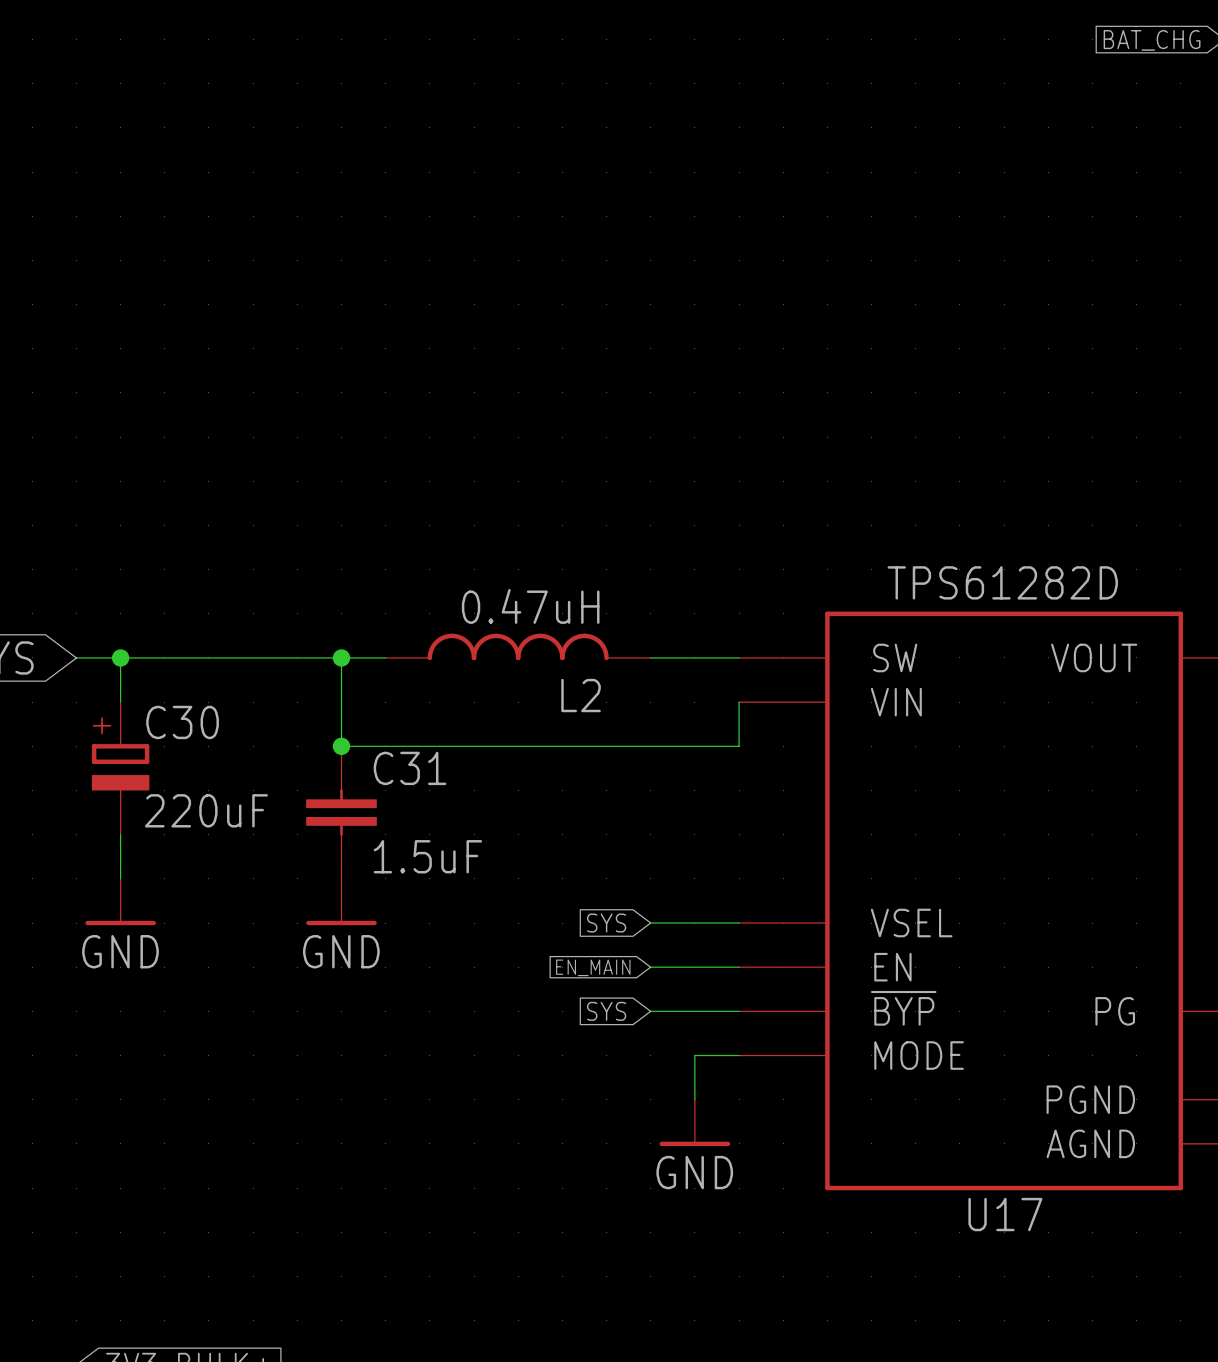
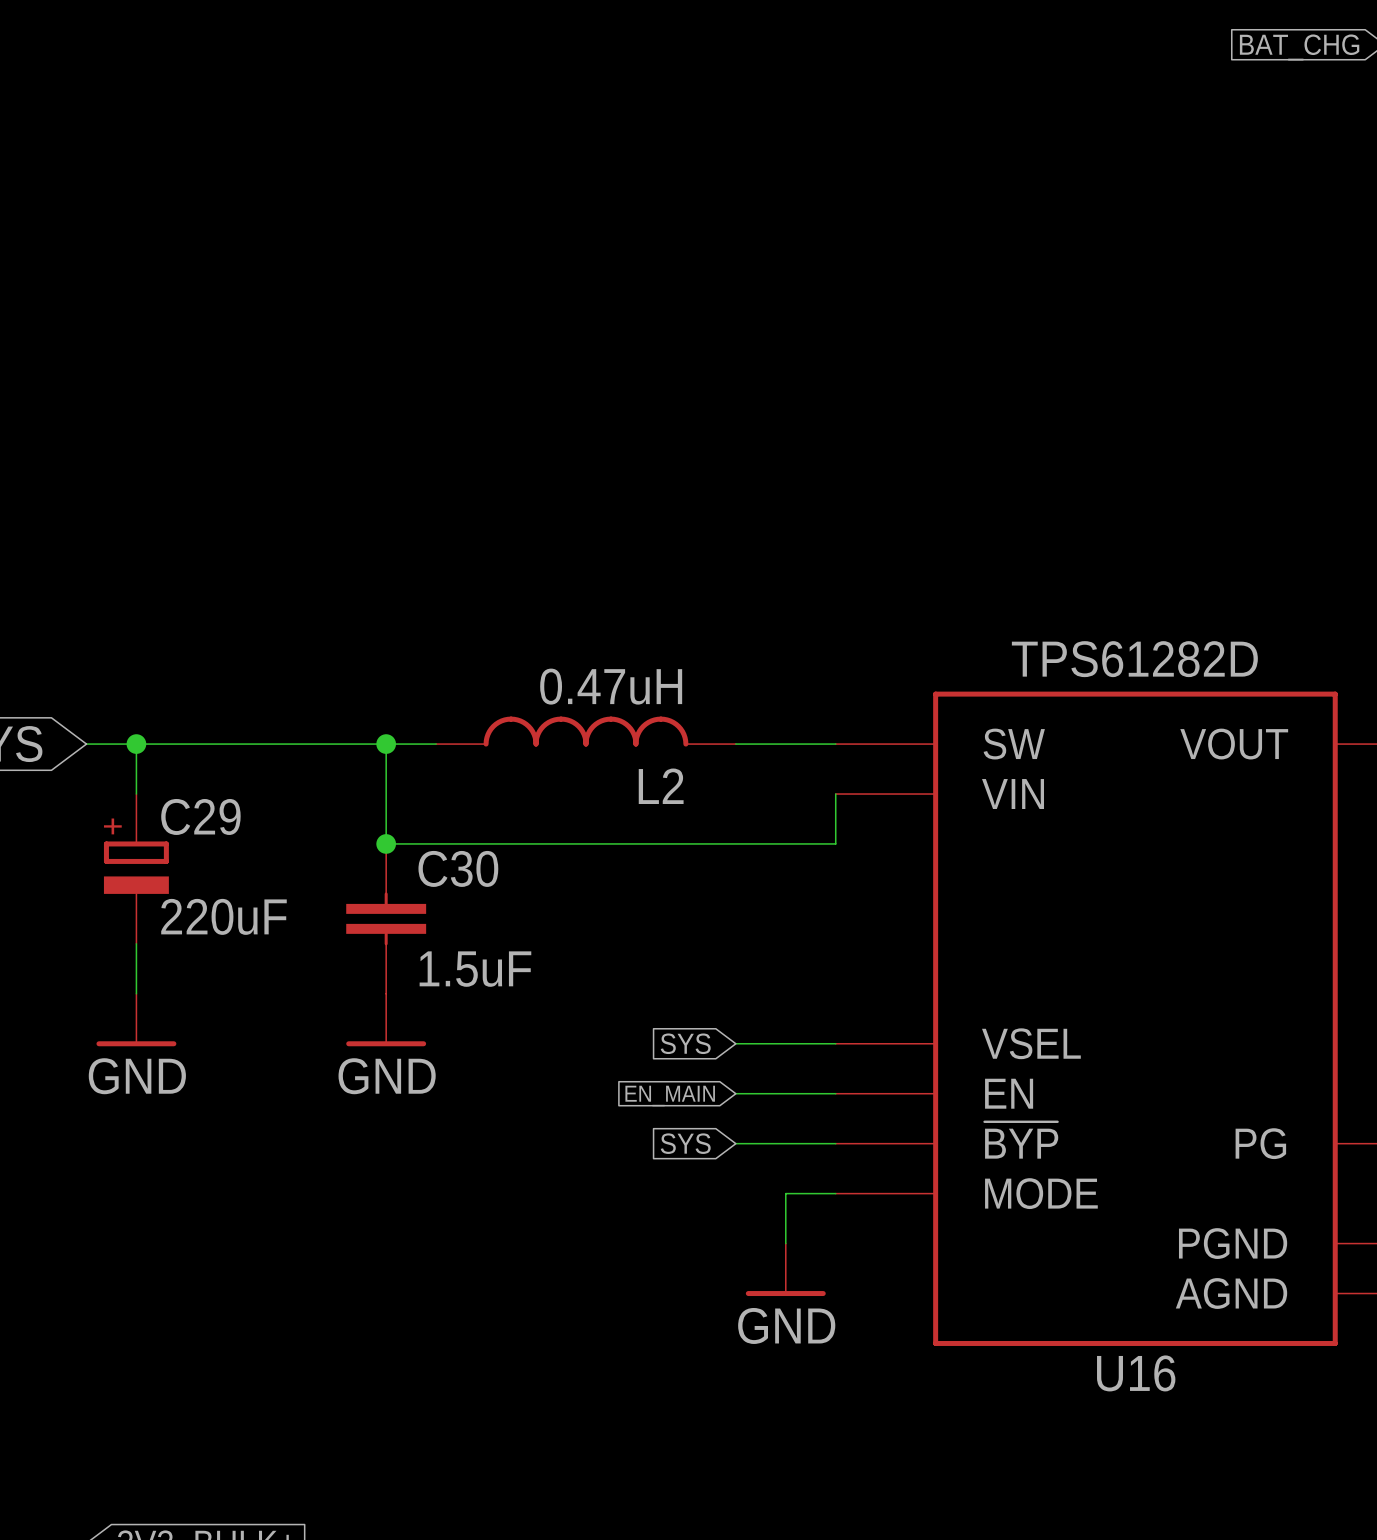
C30 name: C30 (182, 722) -> C29 (200, 816)
C31 name: C31 (410, 768) -> C30 (458, 868)
U17 name: U17 (1005, 1214) -> U16 (1136, 1373)

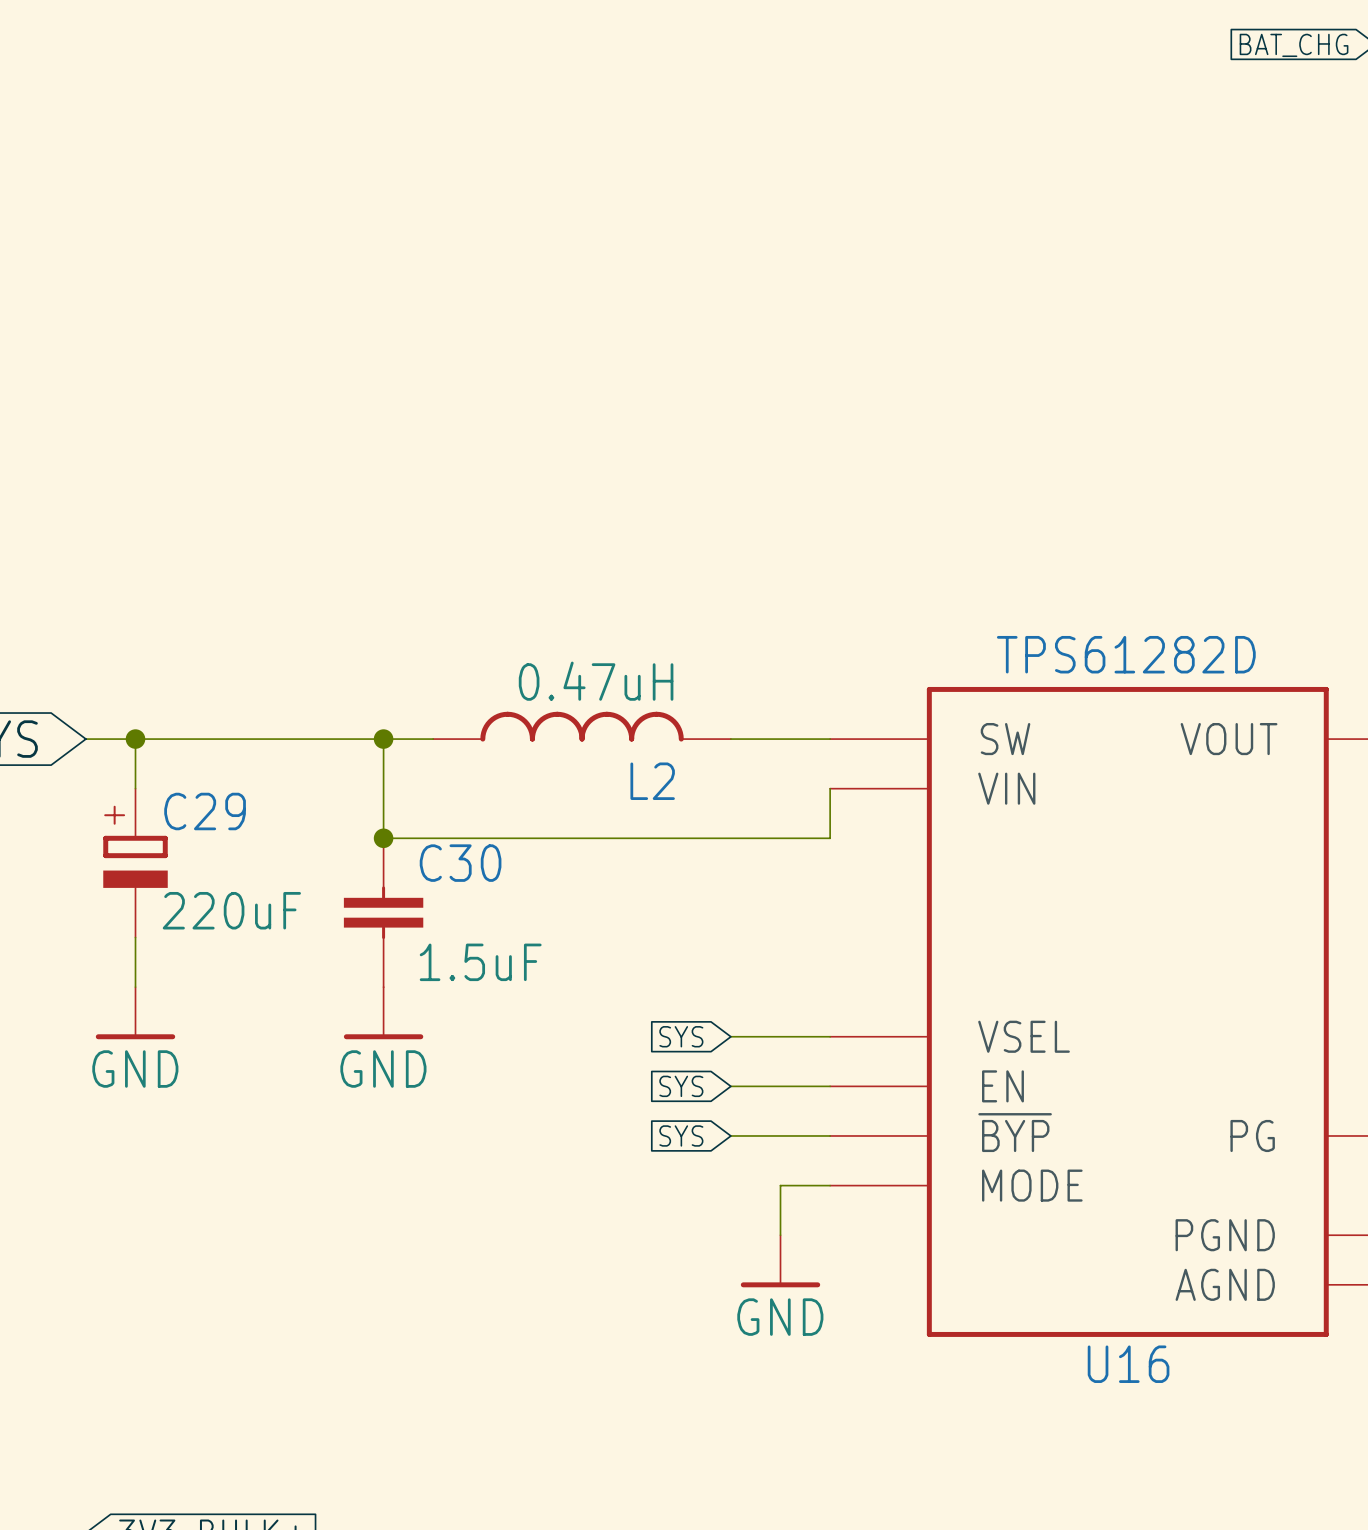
global label: EN_MAIN (670, 1096) -> SYS (681, 1086)

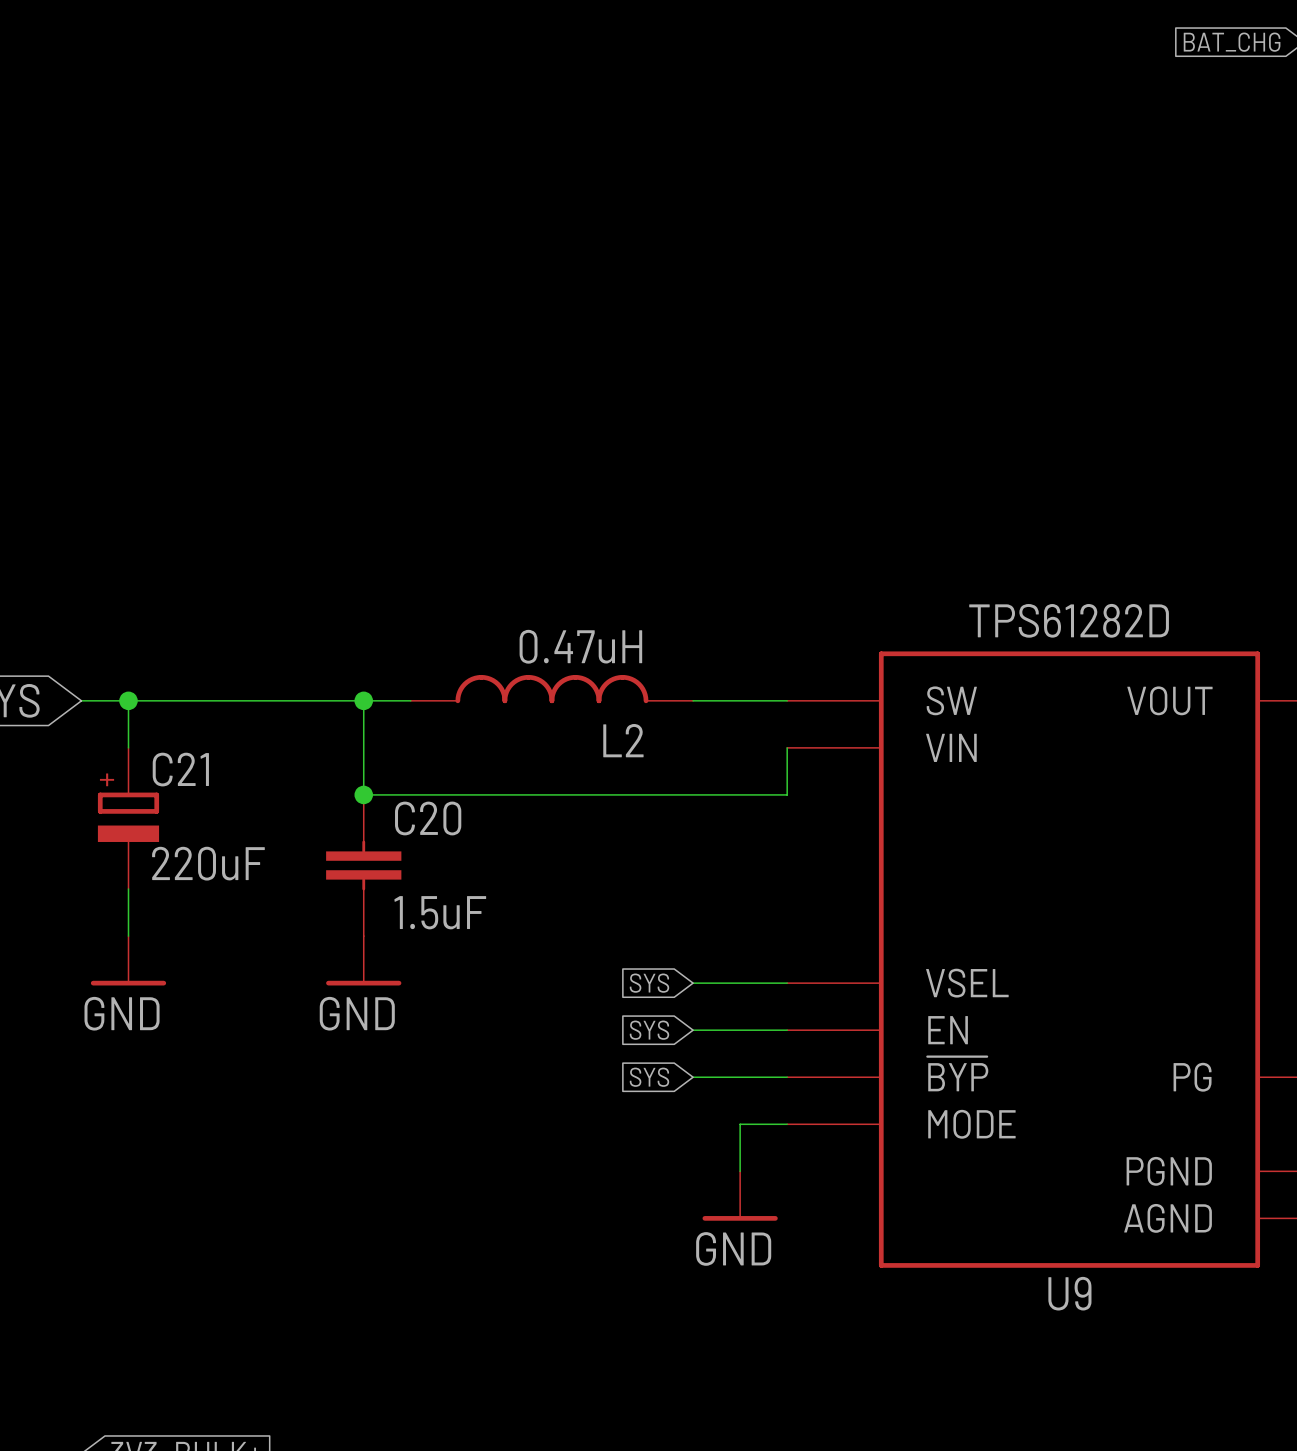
C29 name: C29 (205, 811) -> C21 (180, 769)
C30 name: C30 (460, 863) -> C20 (428, 818)
U16 name: U16 (1128, 1364) -> U9 (1069, 1293)

